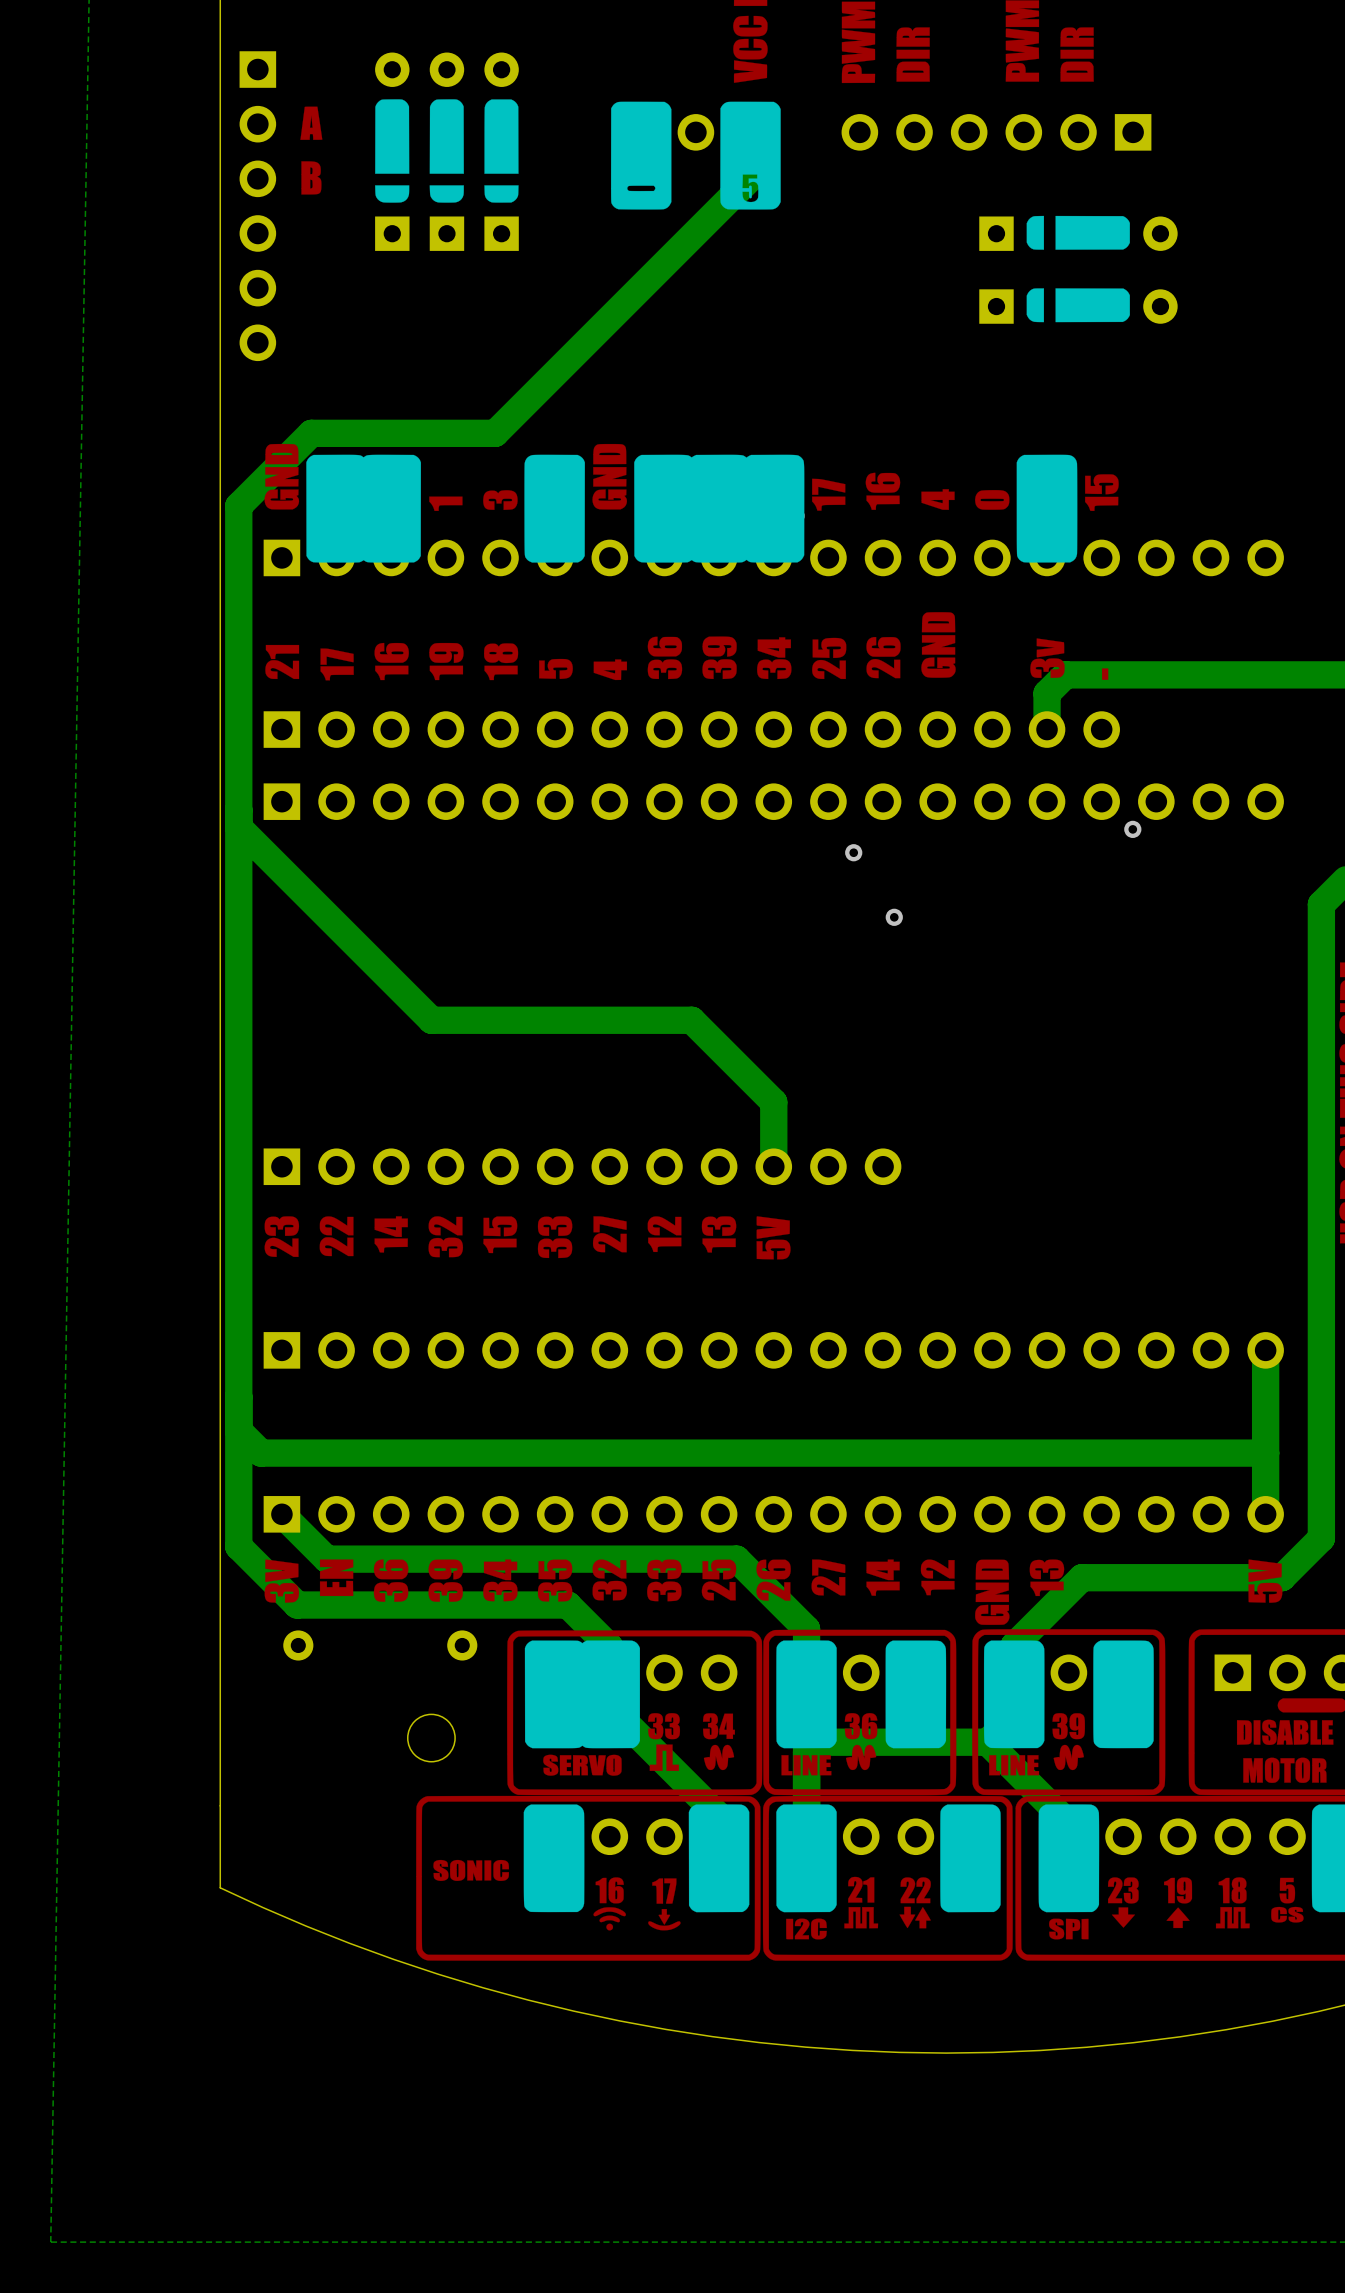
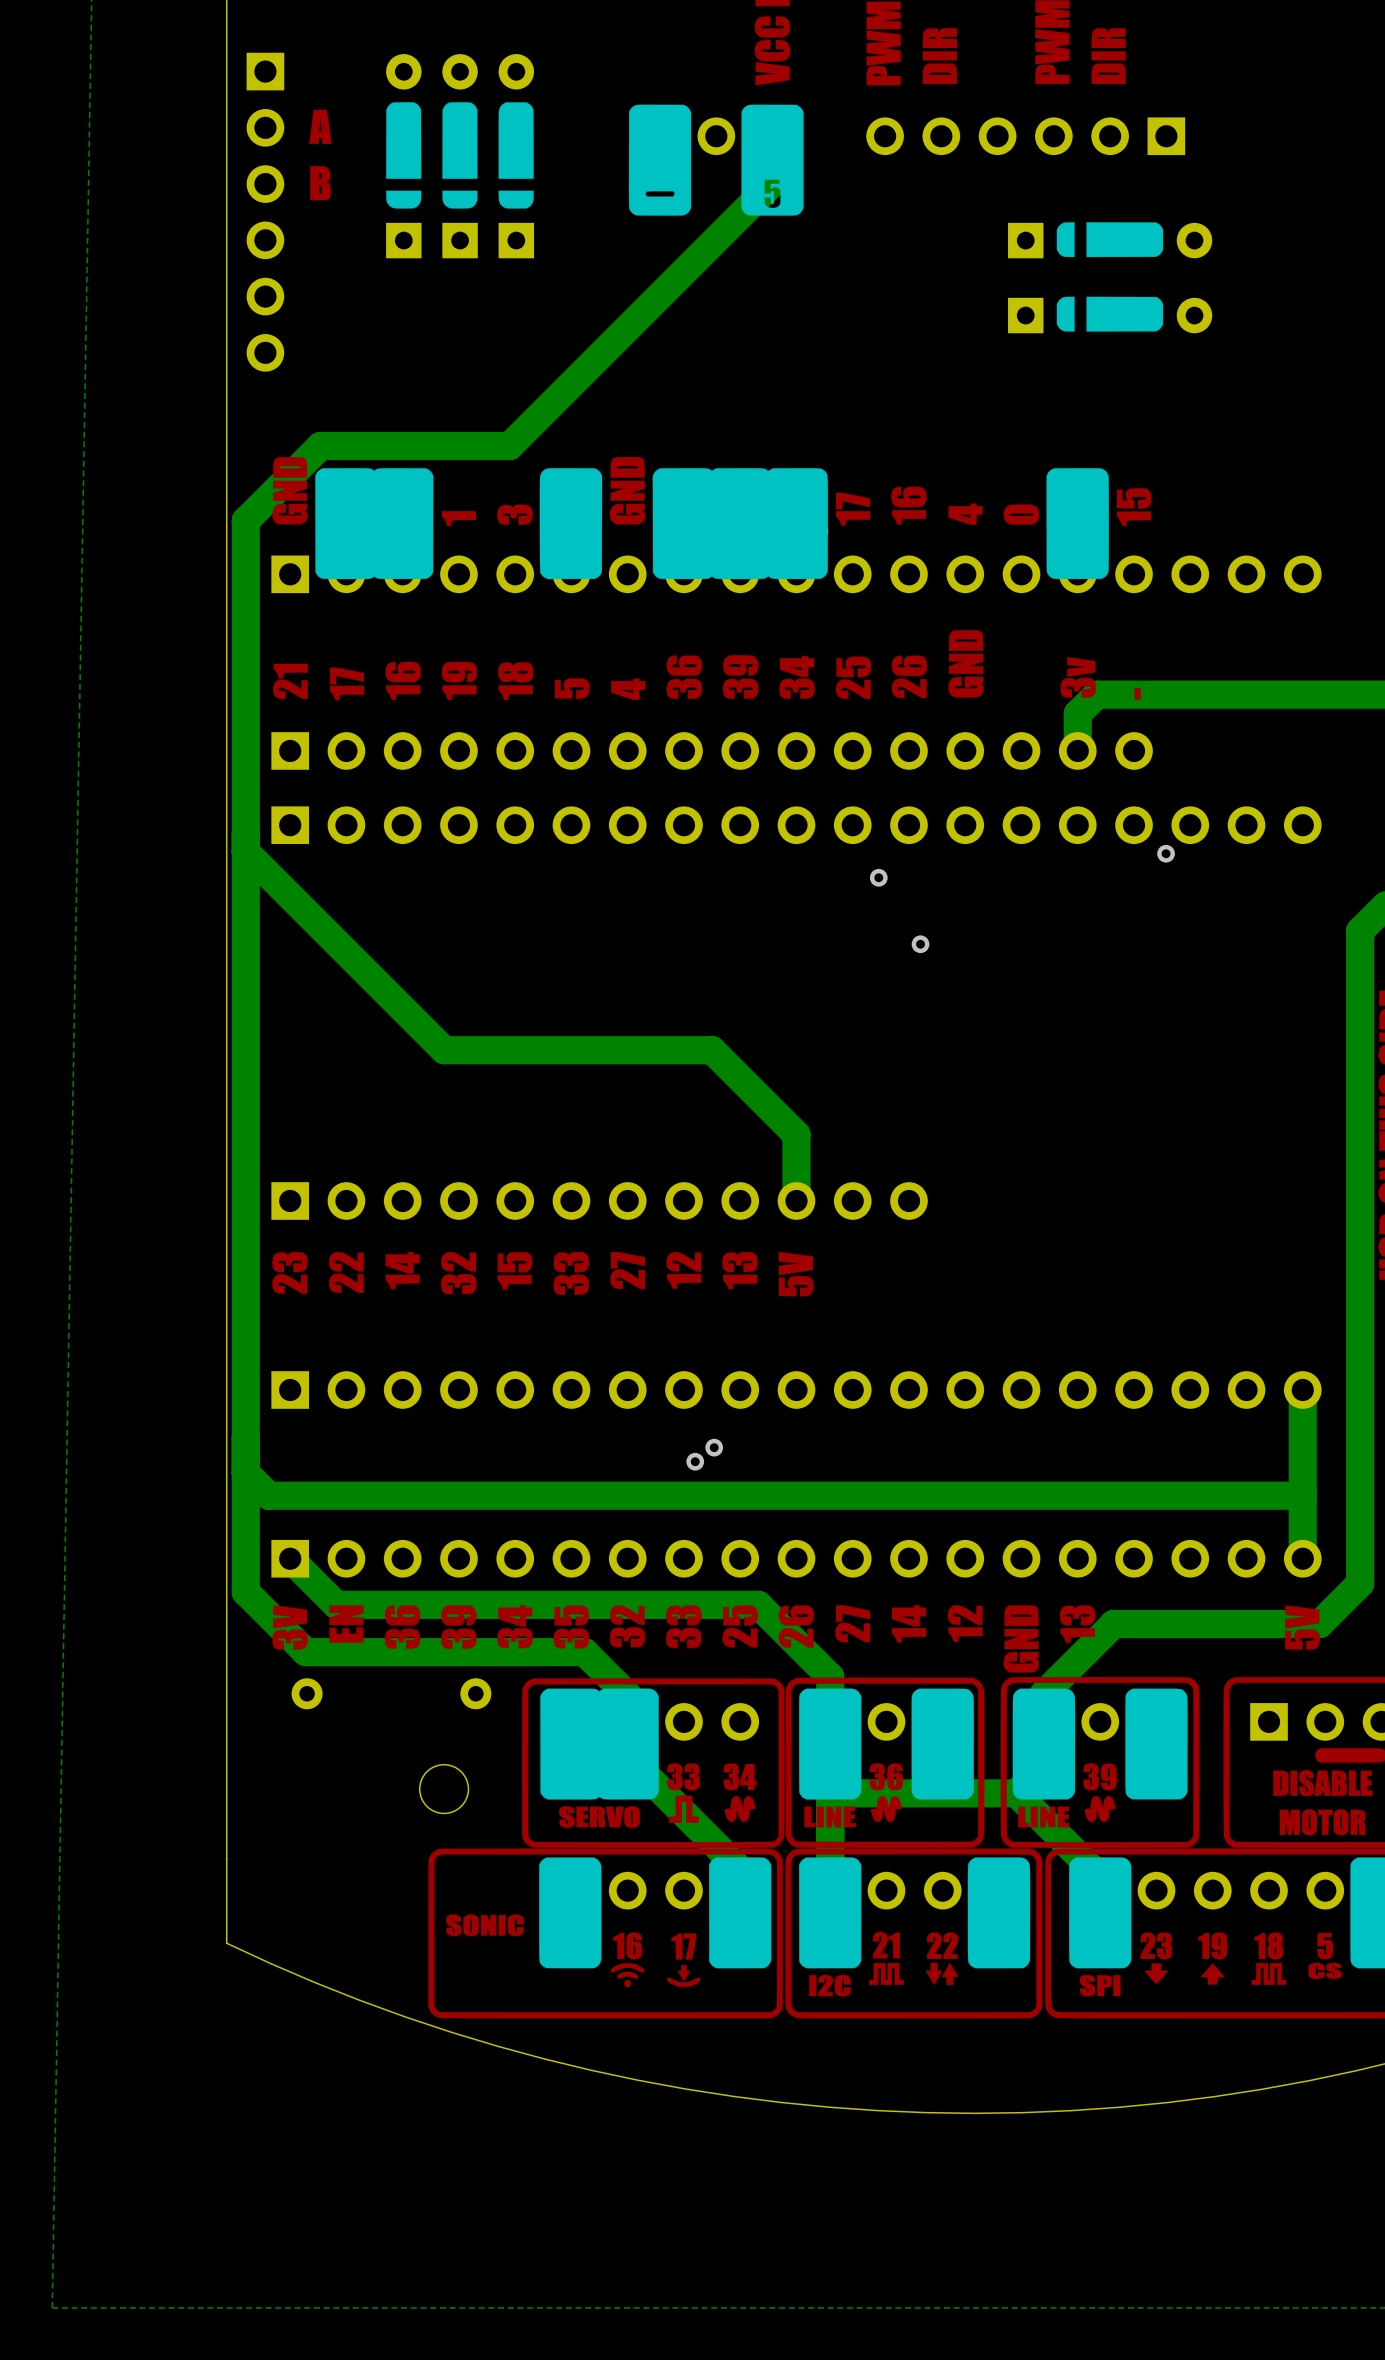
via: none -> (714, 1447)
via: none -> (695, 1461)

